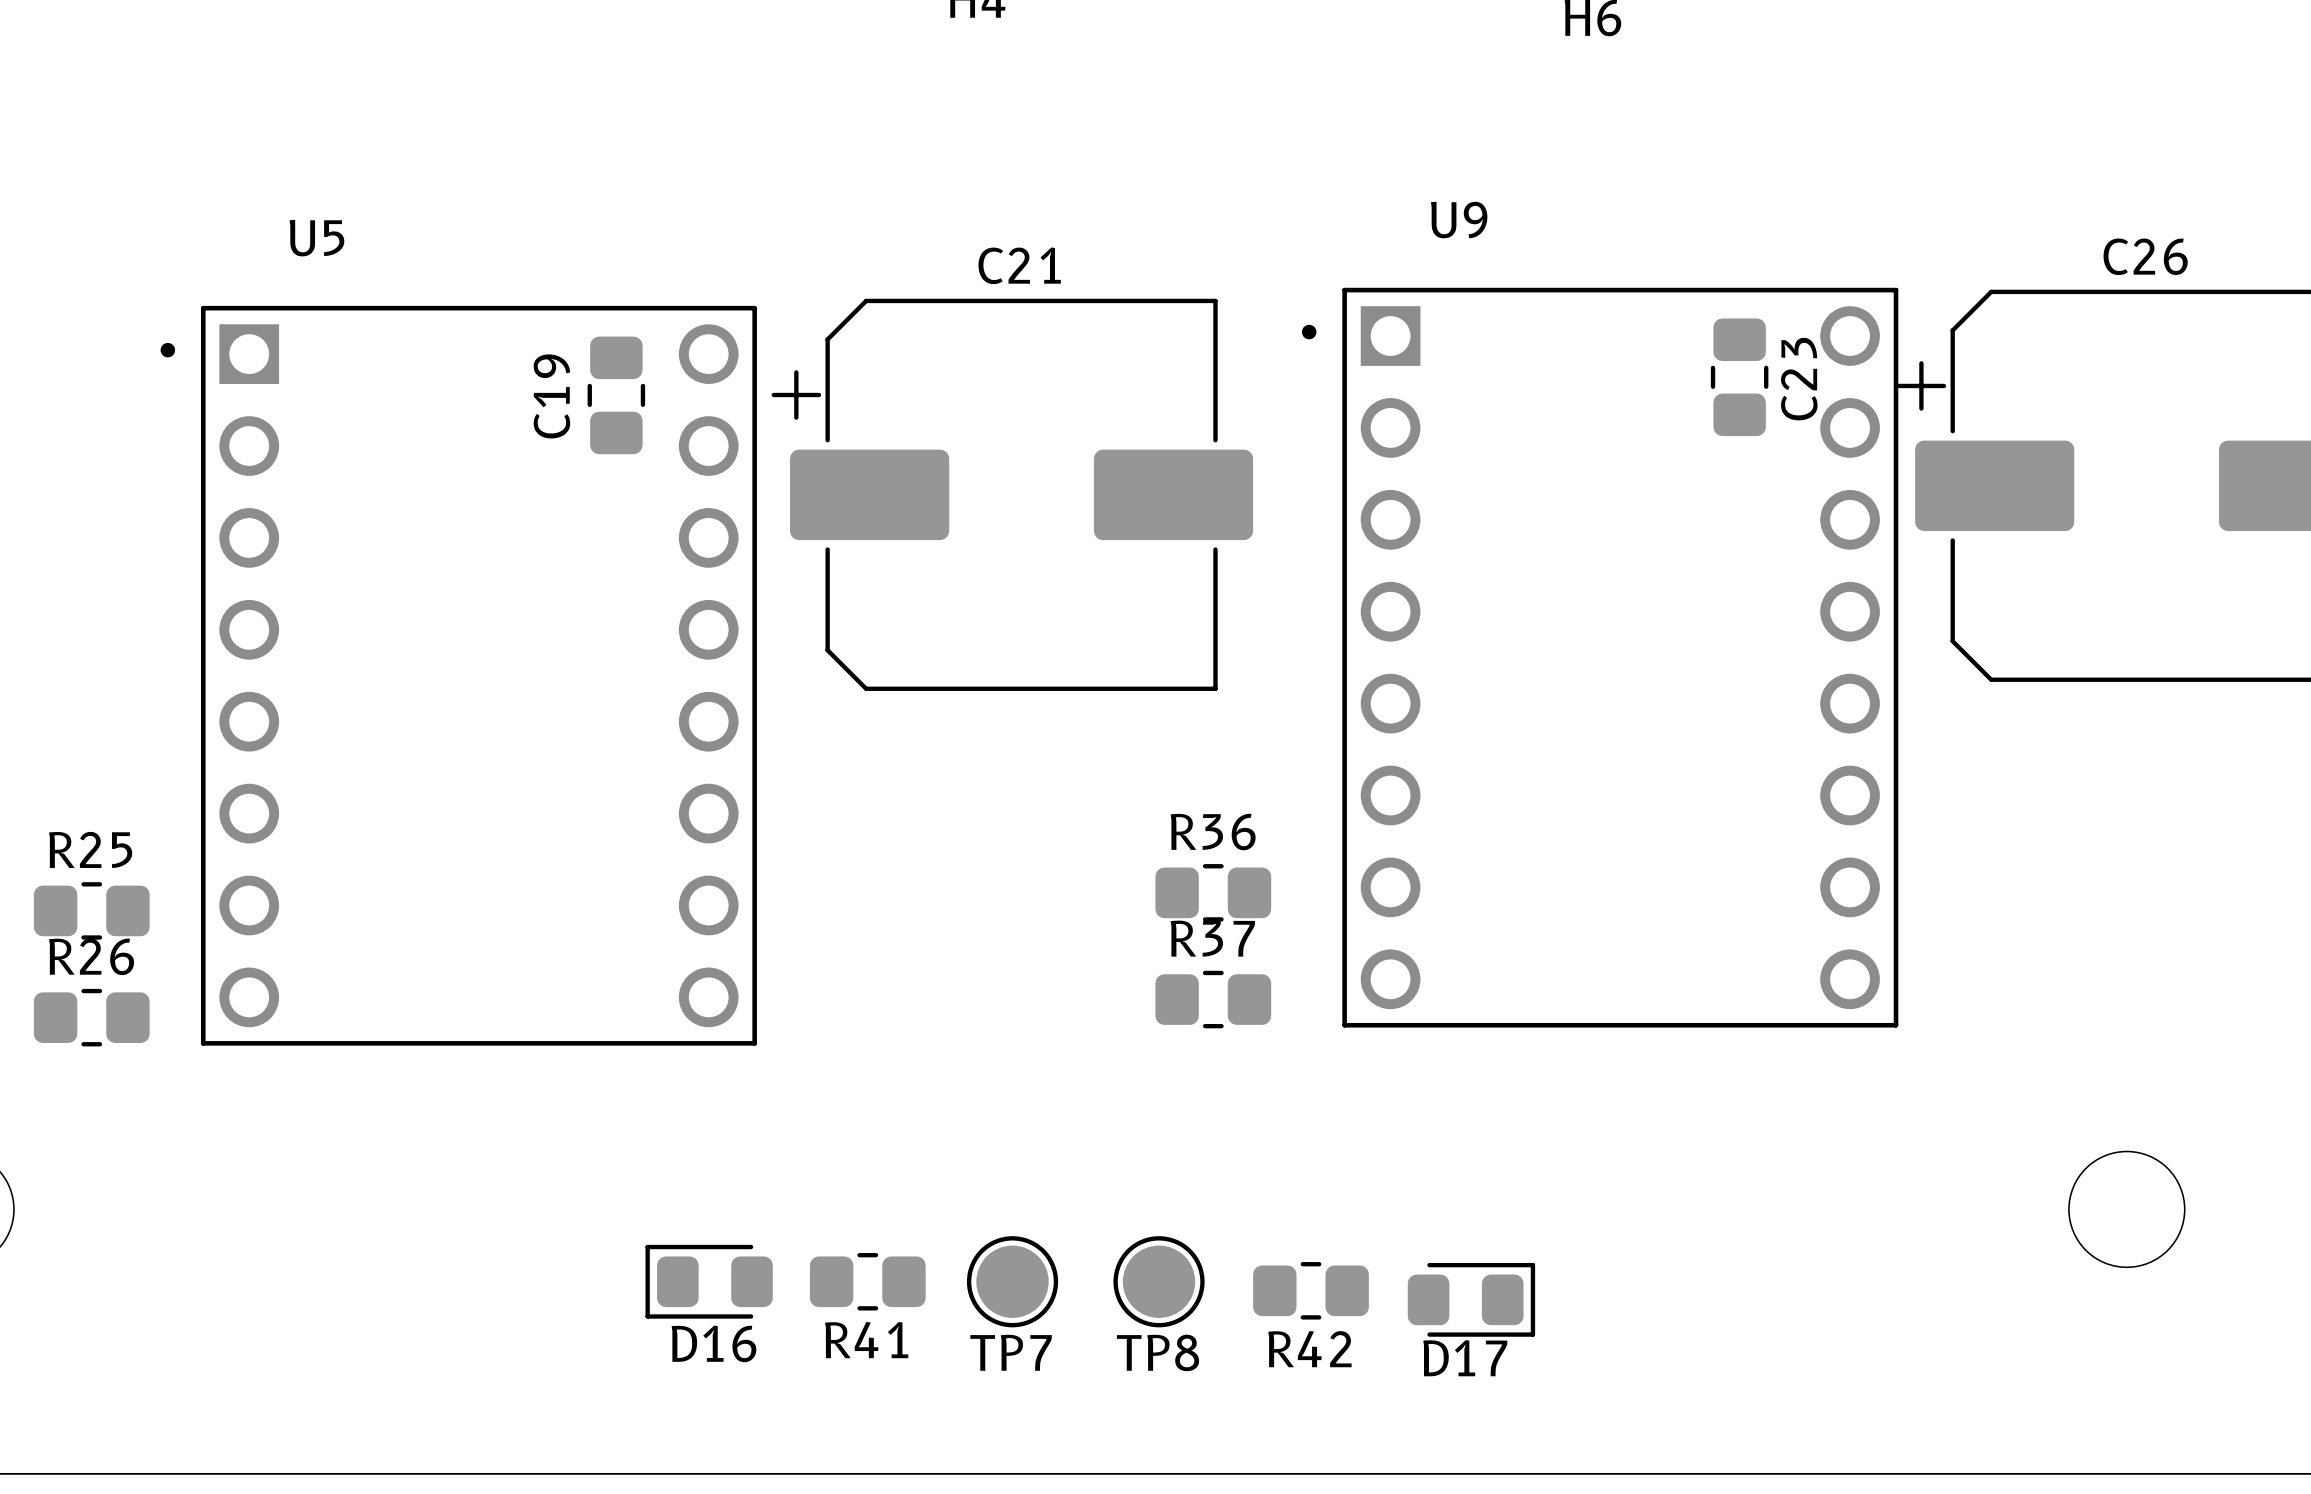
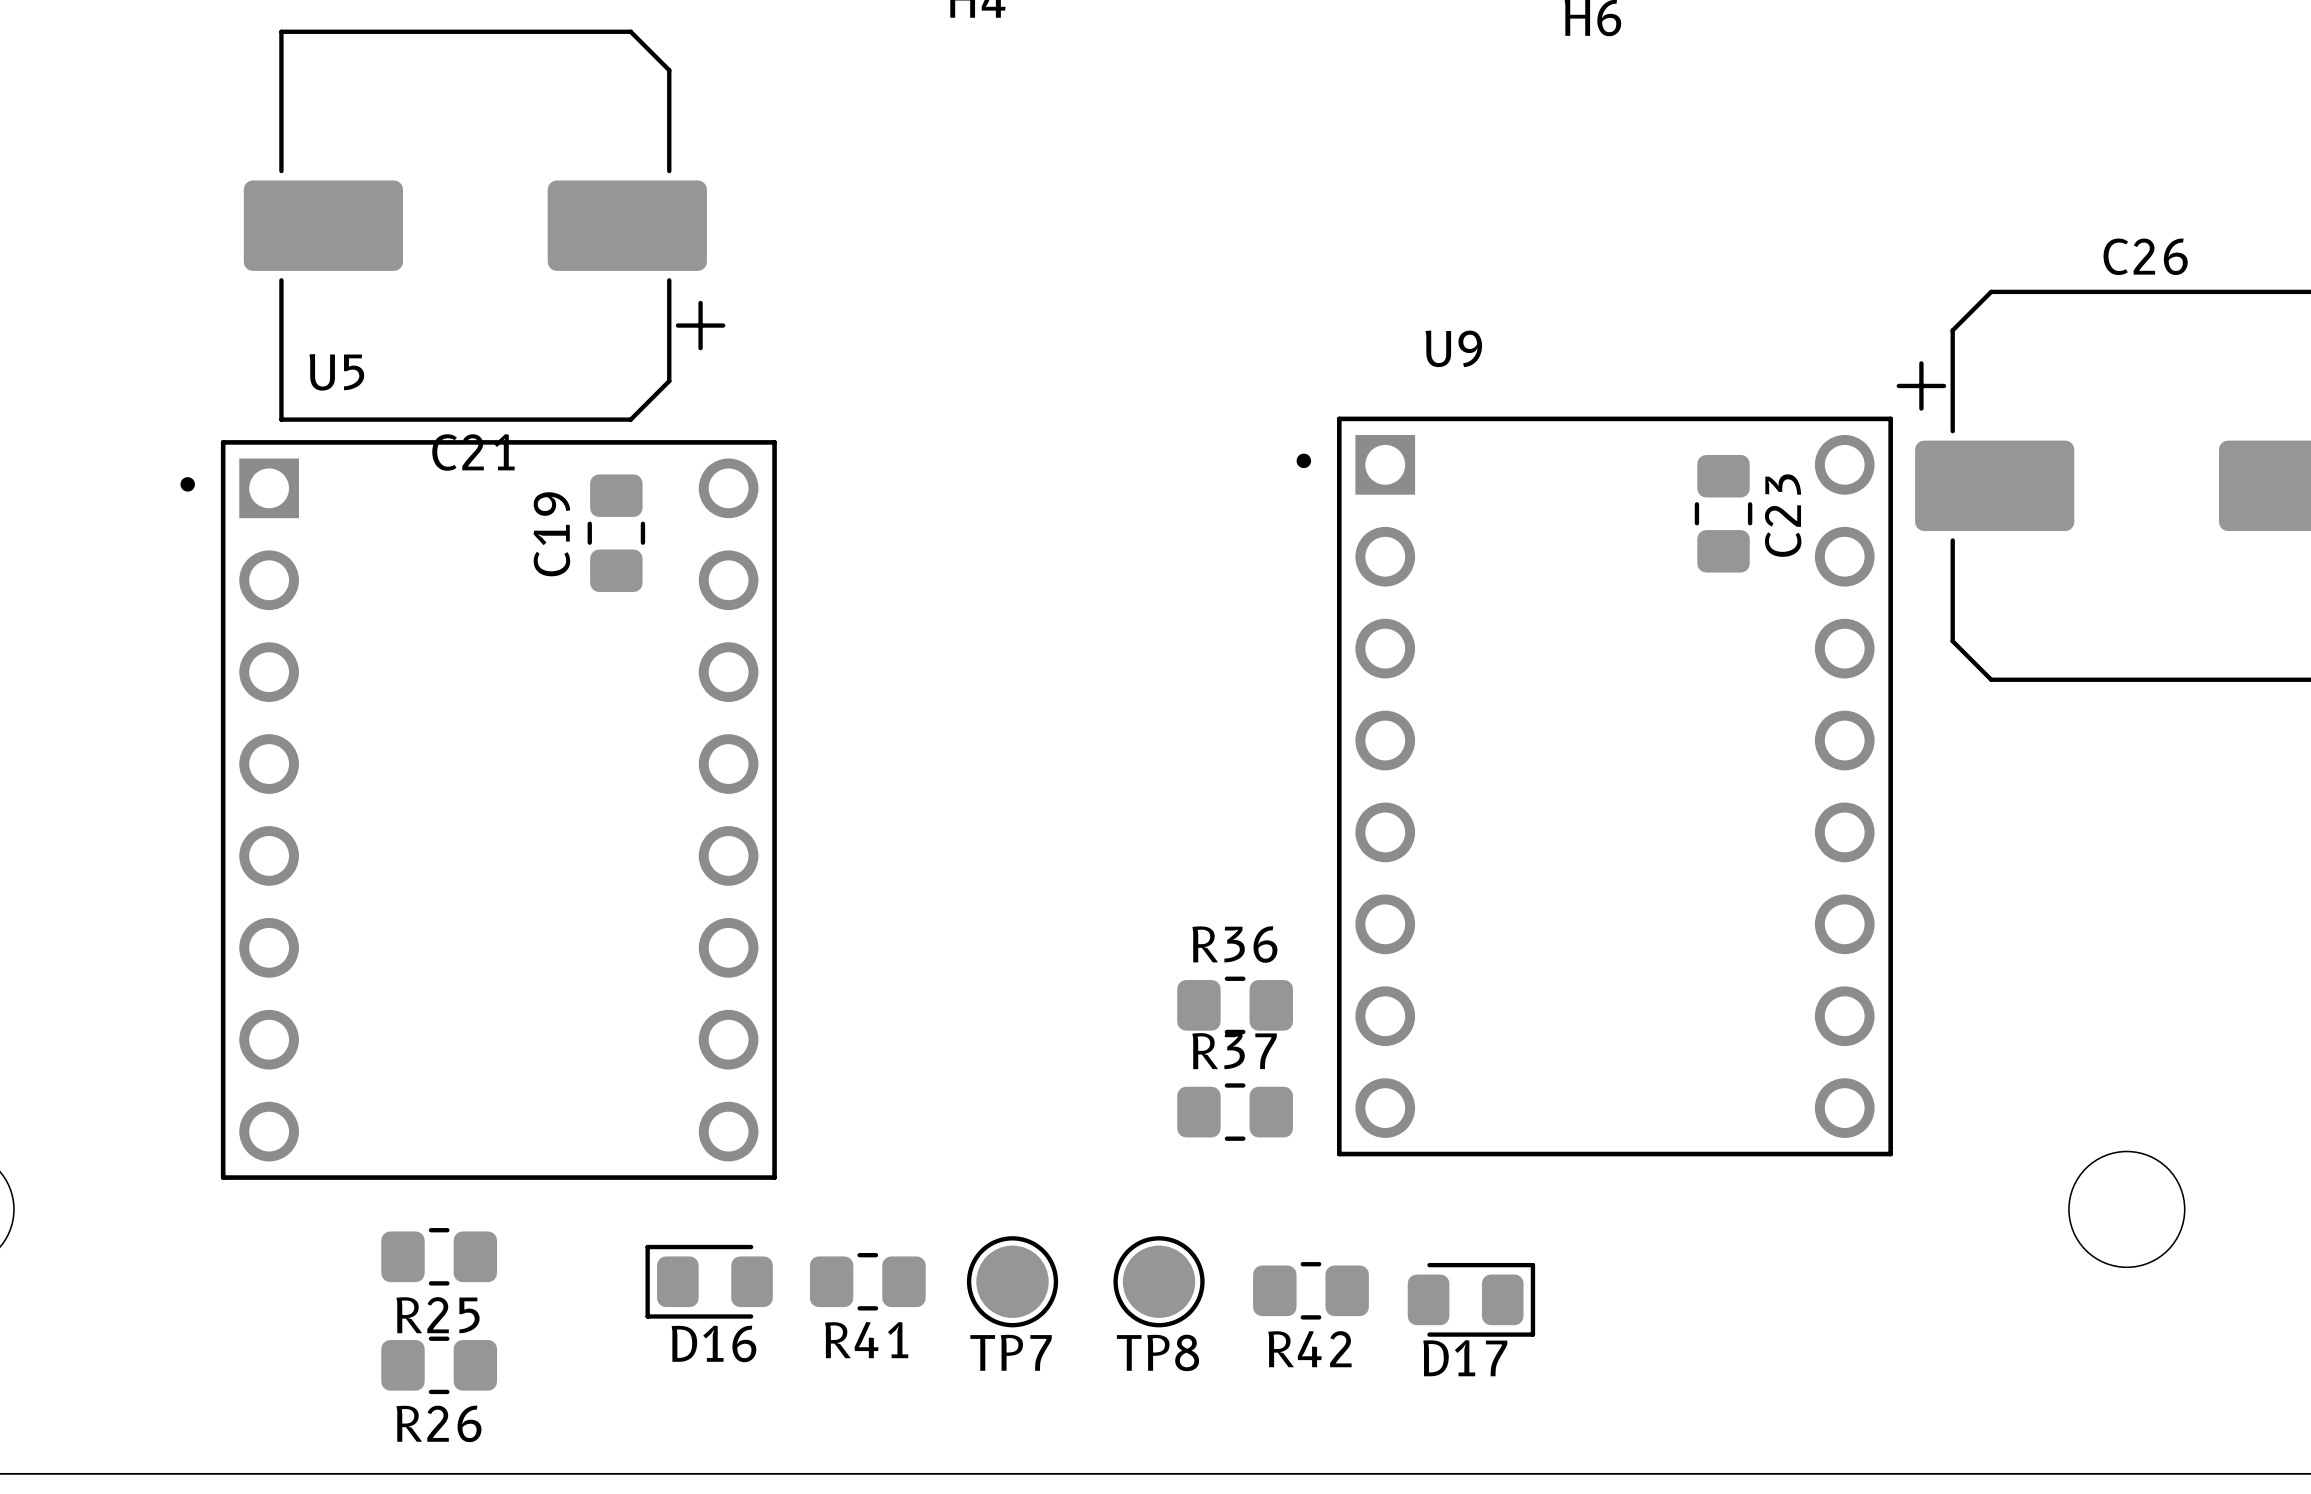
C23 position: (1739, 377) -> (1723, 513)
C19 position: (616, 395) -> (616, 533)
C21 rotation: 0° (1012, 494) -> 180° (484, 225)
C21 position: (1012, 494) -> (484, 225)
U9 position: (1600, 657) -> (1594, 786)
U5 position: (458, 675) -> (478, 809)
R25 name position: R25 (90, 849) -> R25 (438, 1315)
R36 position: (1213, 892) -> (1235, 1005)
R25 position: (91, 910) -> (439, 1256)
R26 name position: R26 (91, 956) -> R26 (438, 1423)
R37 position: (1213, 999) -> (1235, 1112)
R26 position: (91, 1017) -> (439, 1365)

